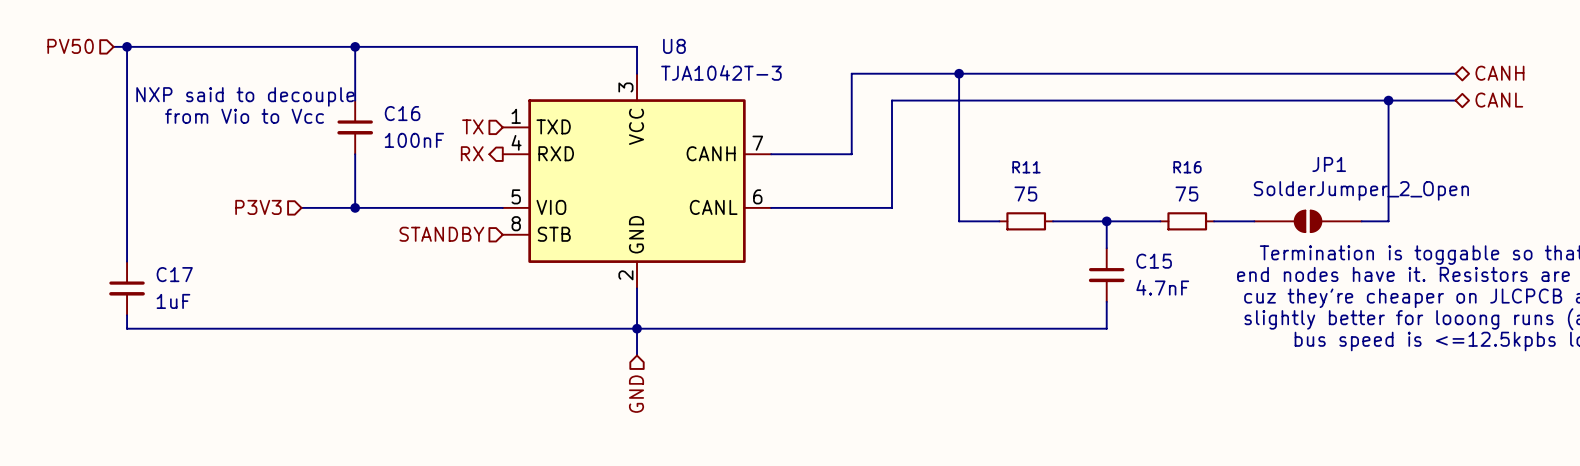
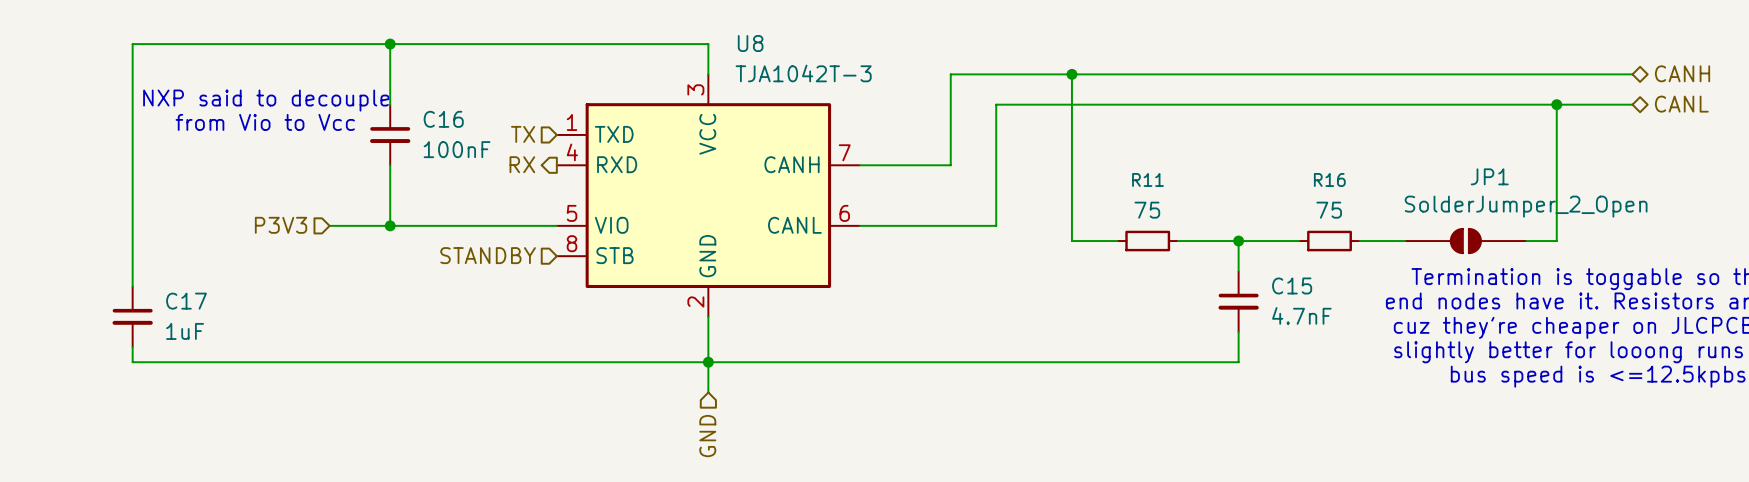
hierarchical label: PV50 (70, 46) -> none
wire: (113, 46) (127, 46) -> none
junction: (127, 46) -> none

